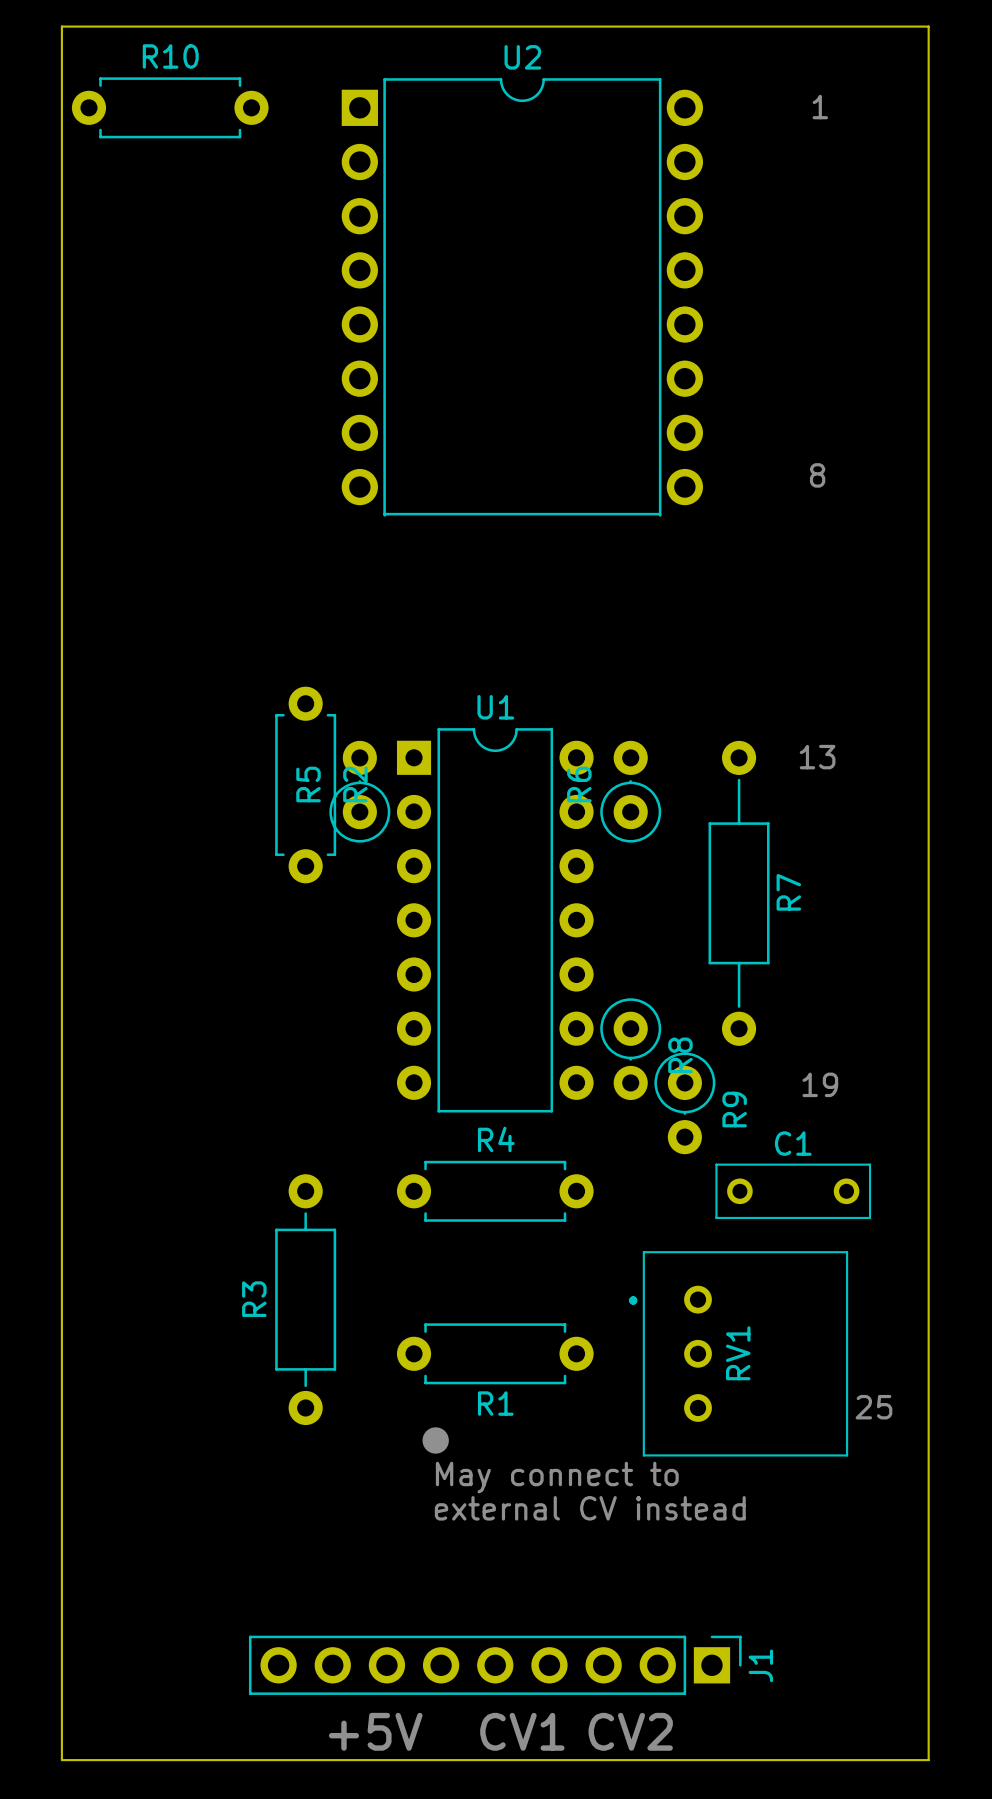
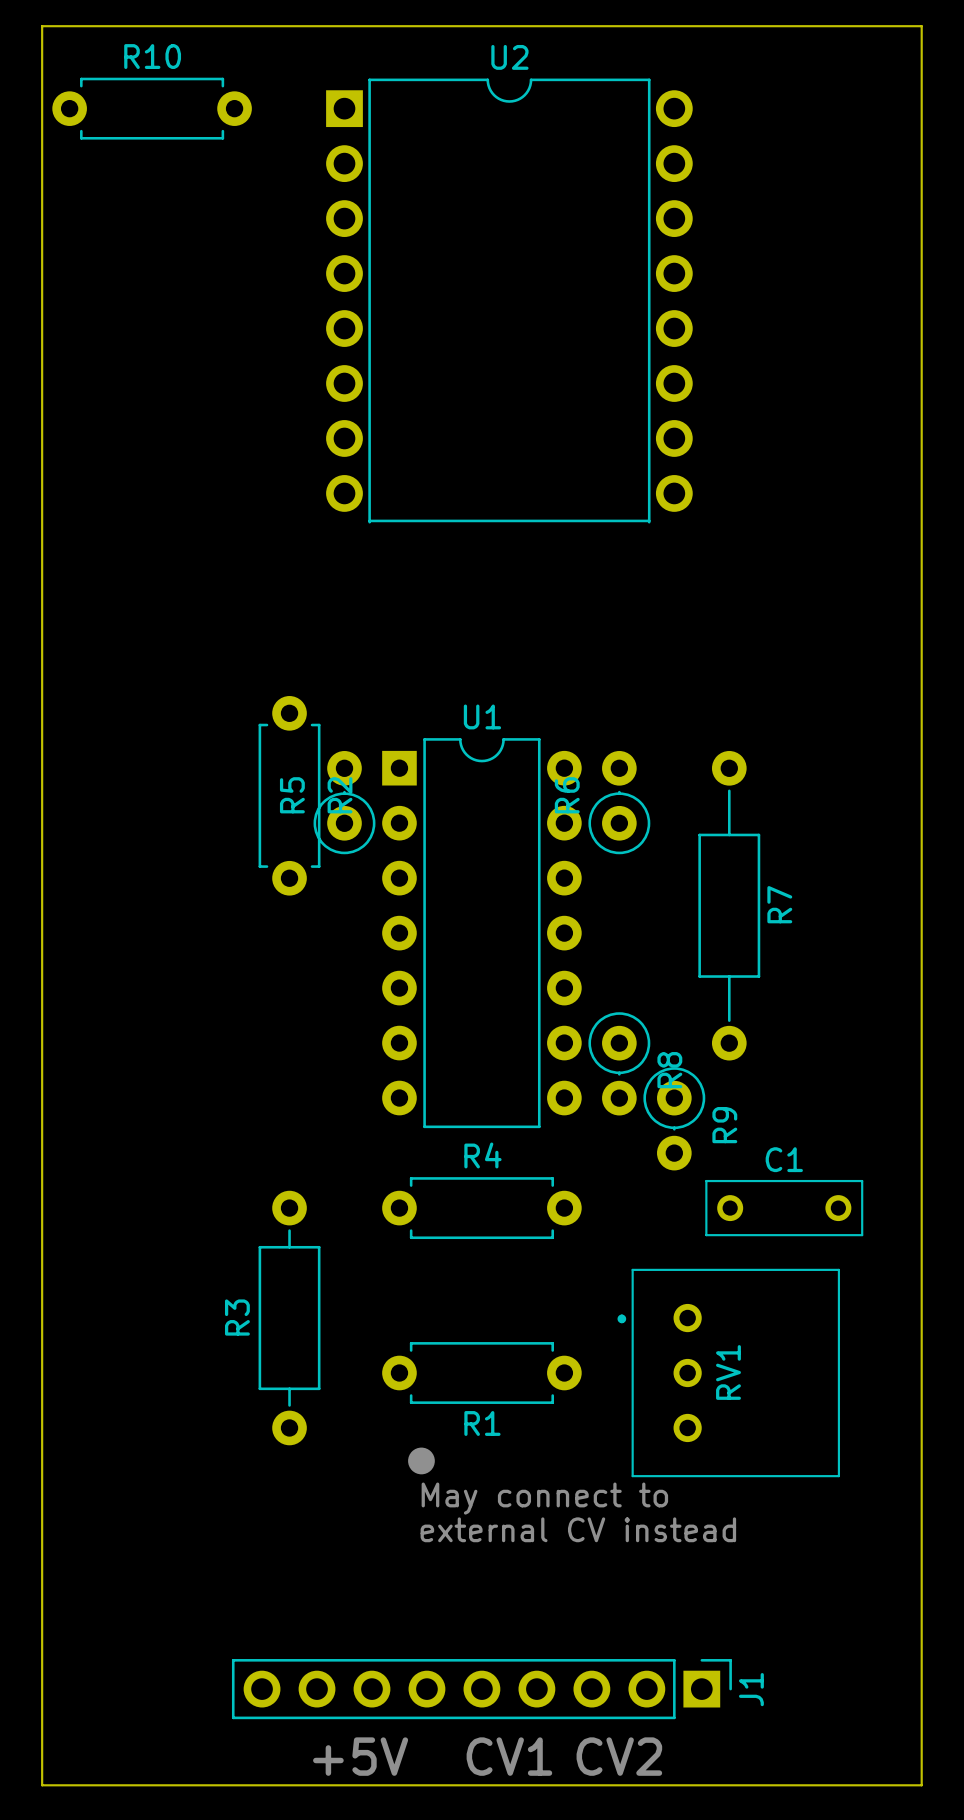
text: 1 (820, 107) -> none
text: 8 (817, 475) -> none
text: 13 (817, 757) -> none
text: 19 (820, 1084) -> none
text: 25 (873, 1407) -> none

